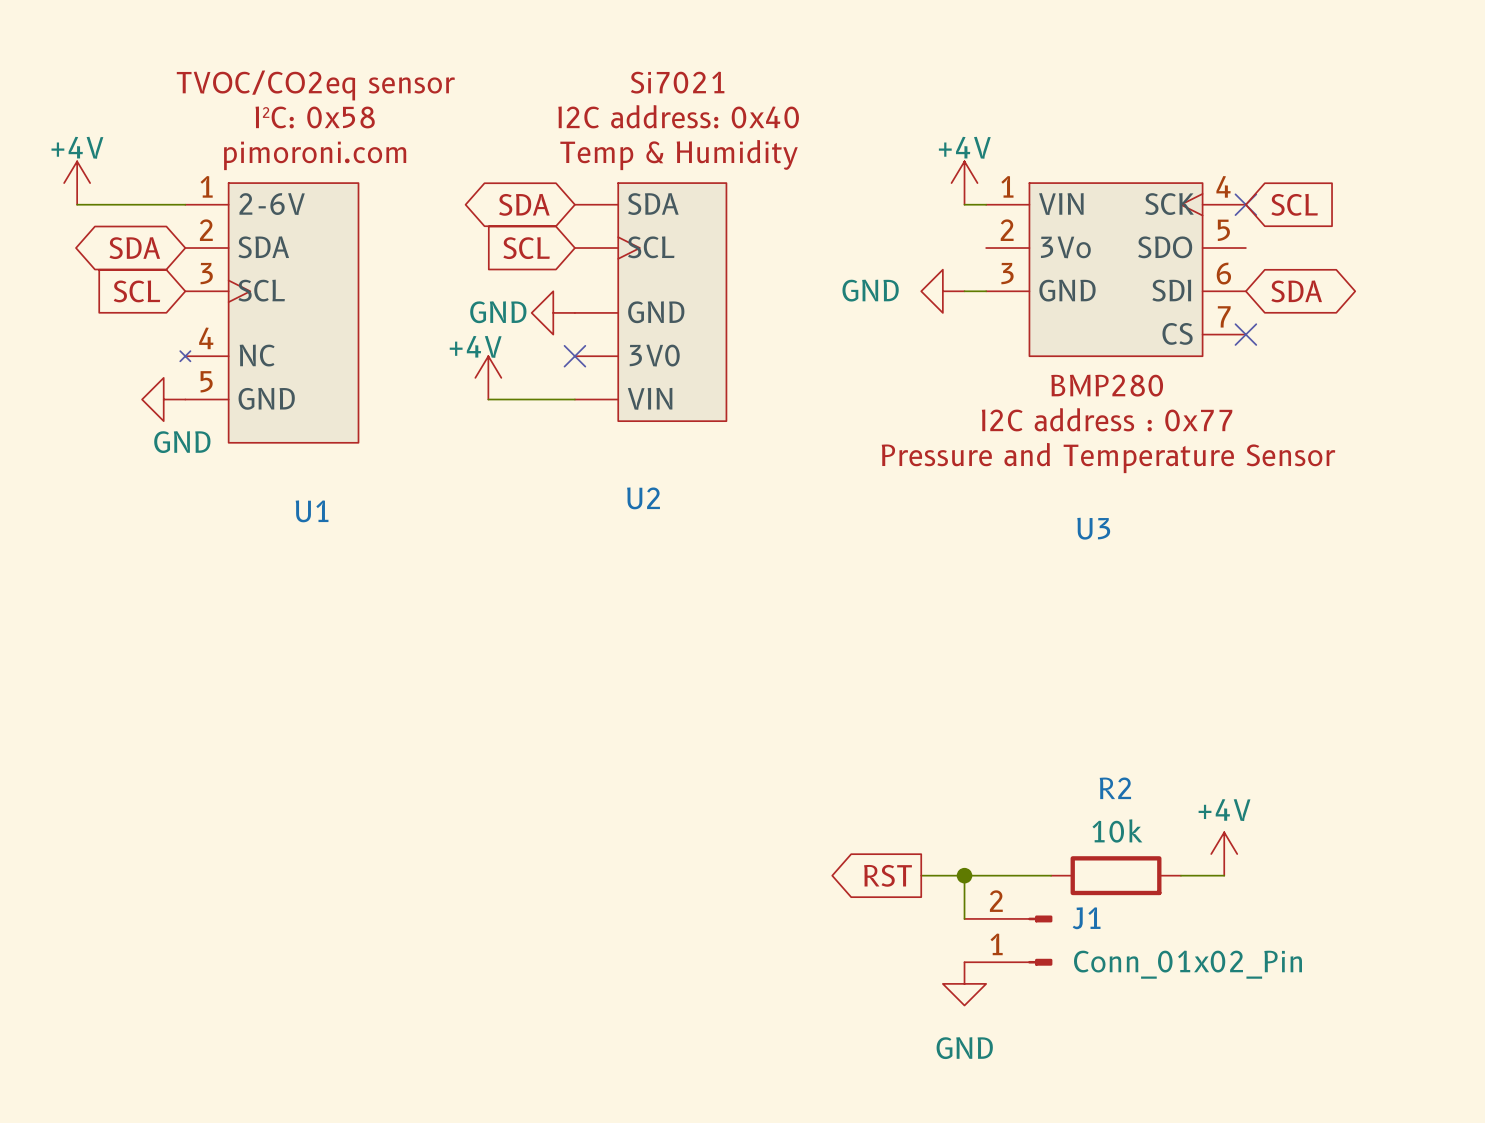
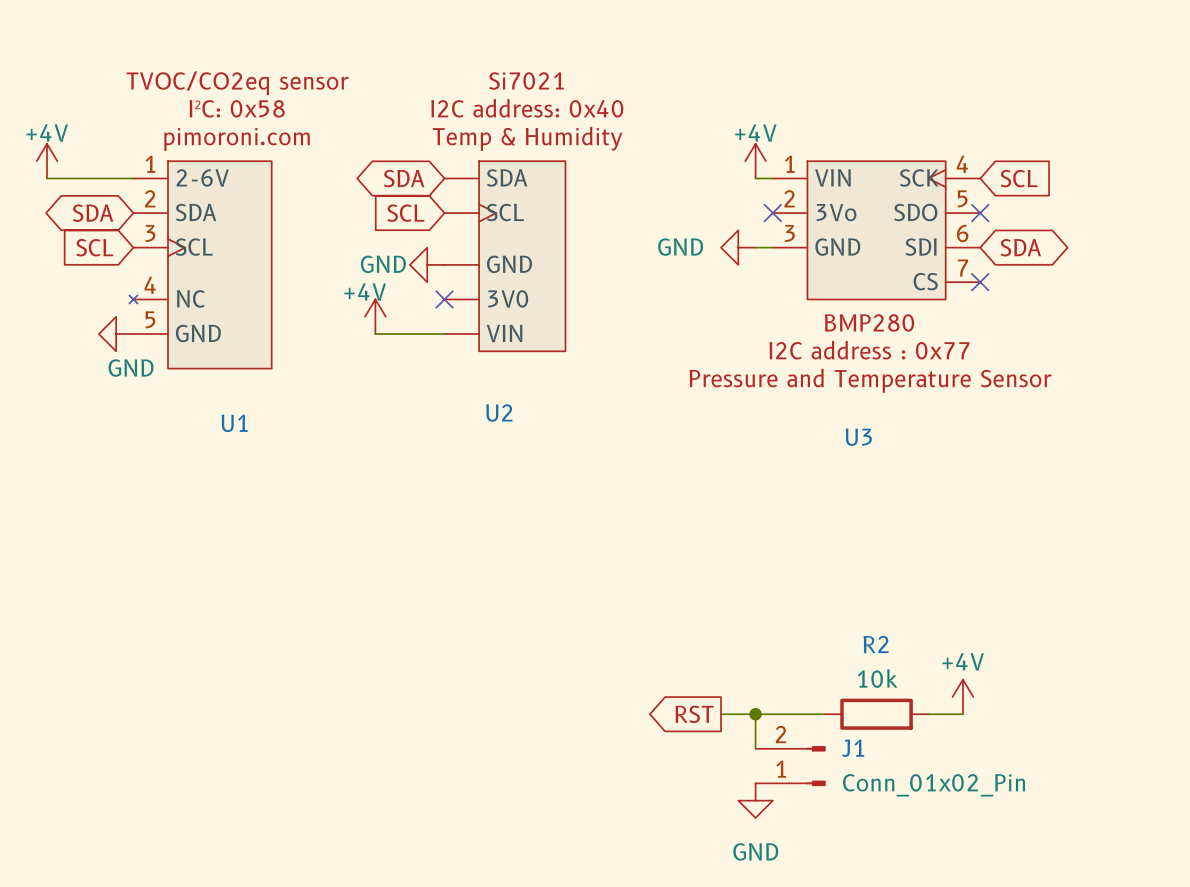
no-connect mark position: (1245, 204) -> (980, 213)
no-connect mark: none -> (772, 213)

